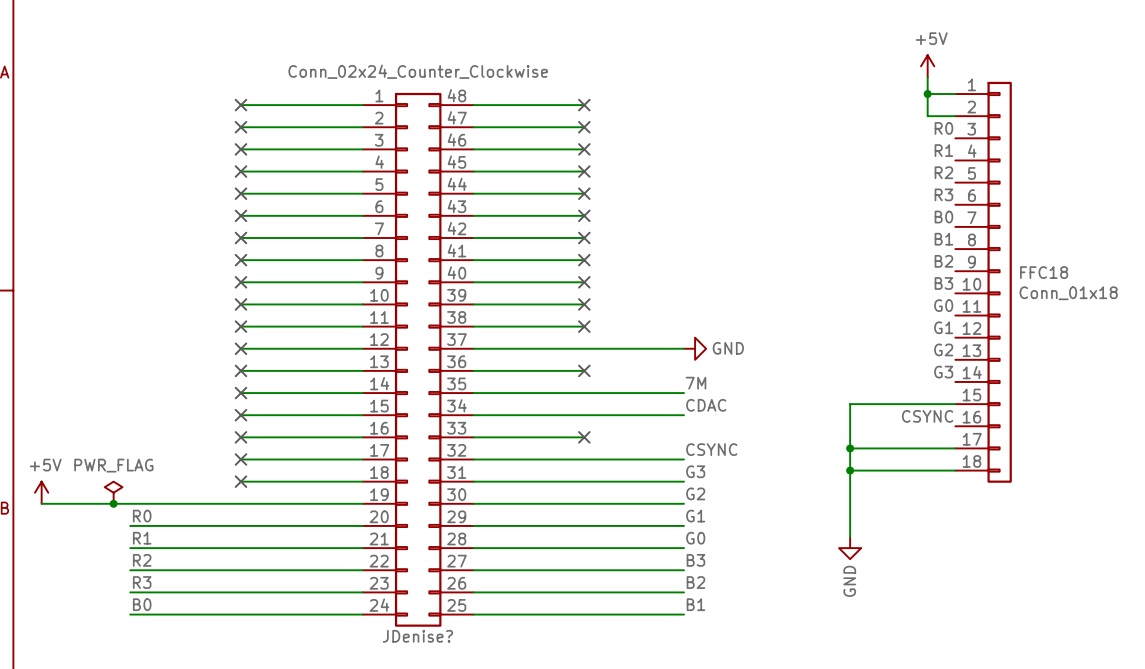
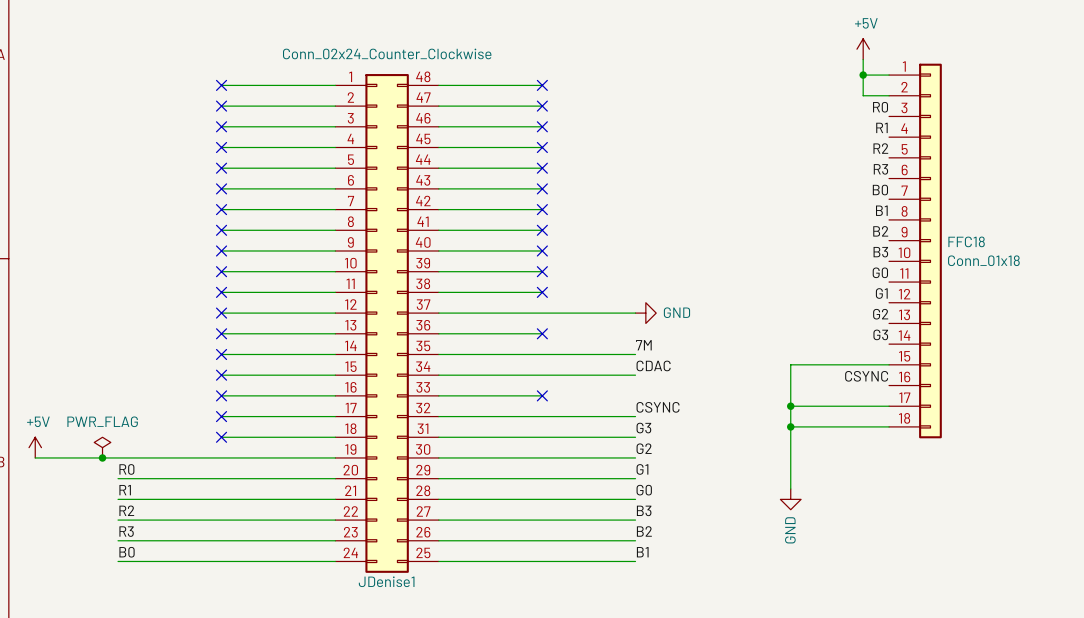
JDenise? name: JDenise? (417, 636) -> JDenise1 (386, 581)

